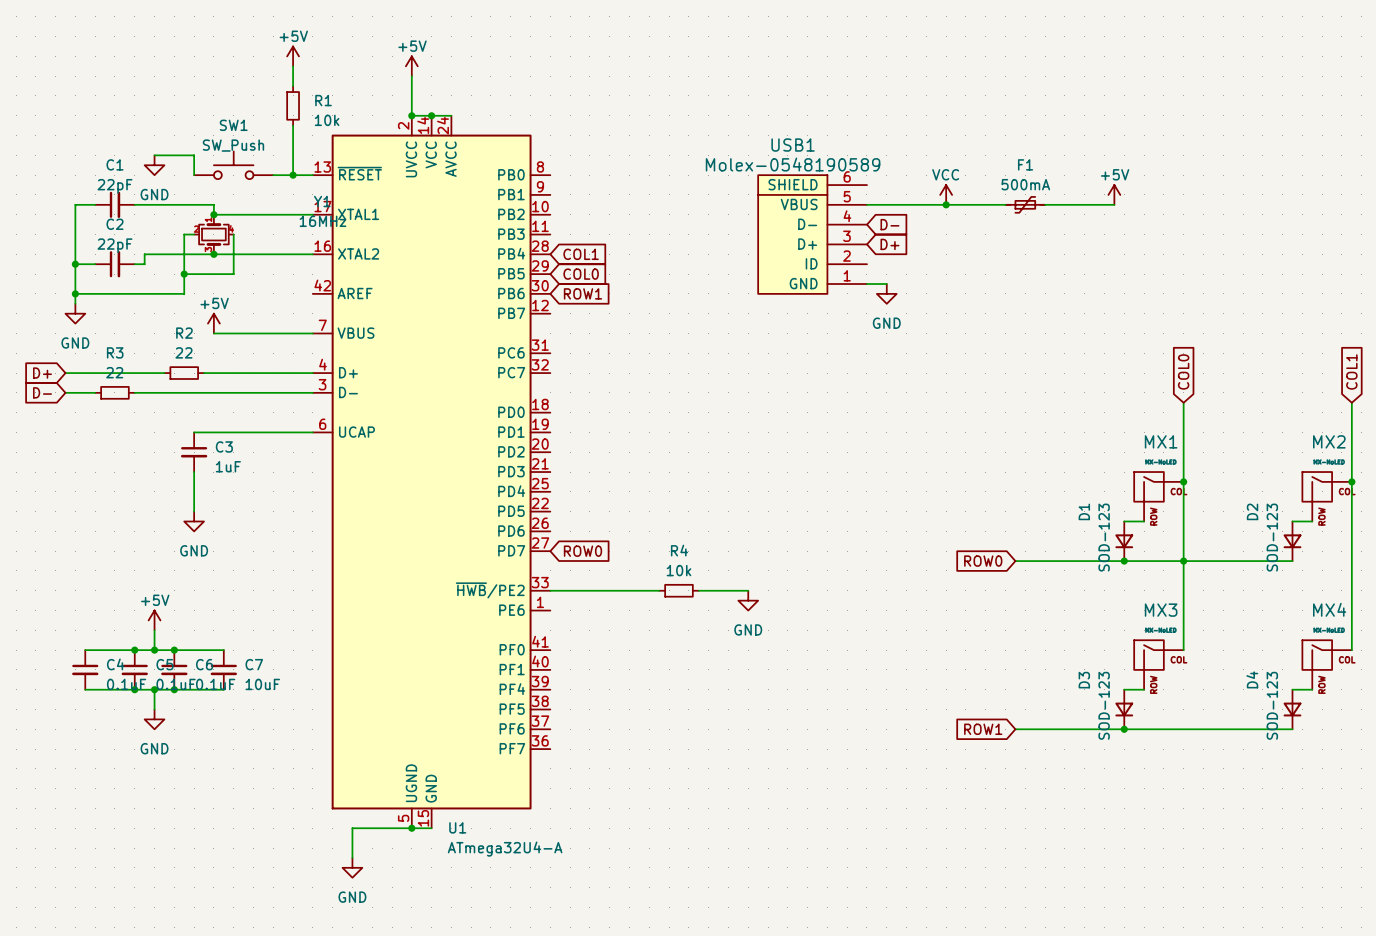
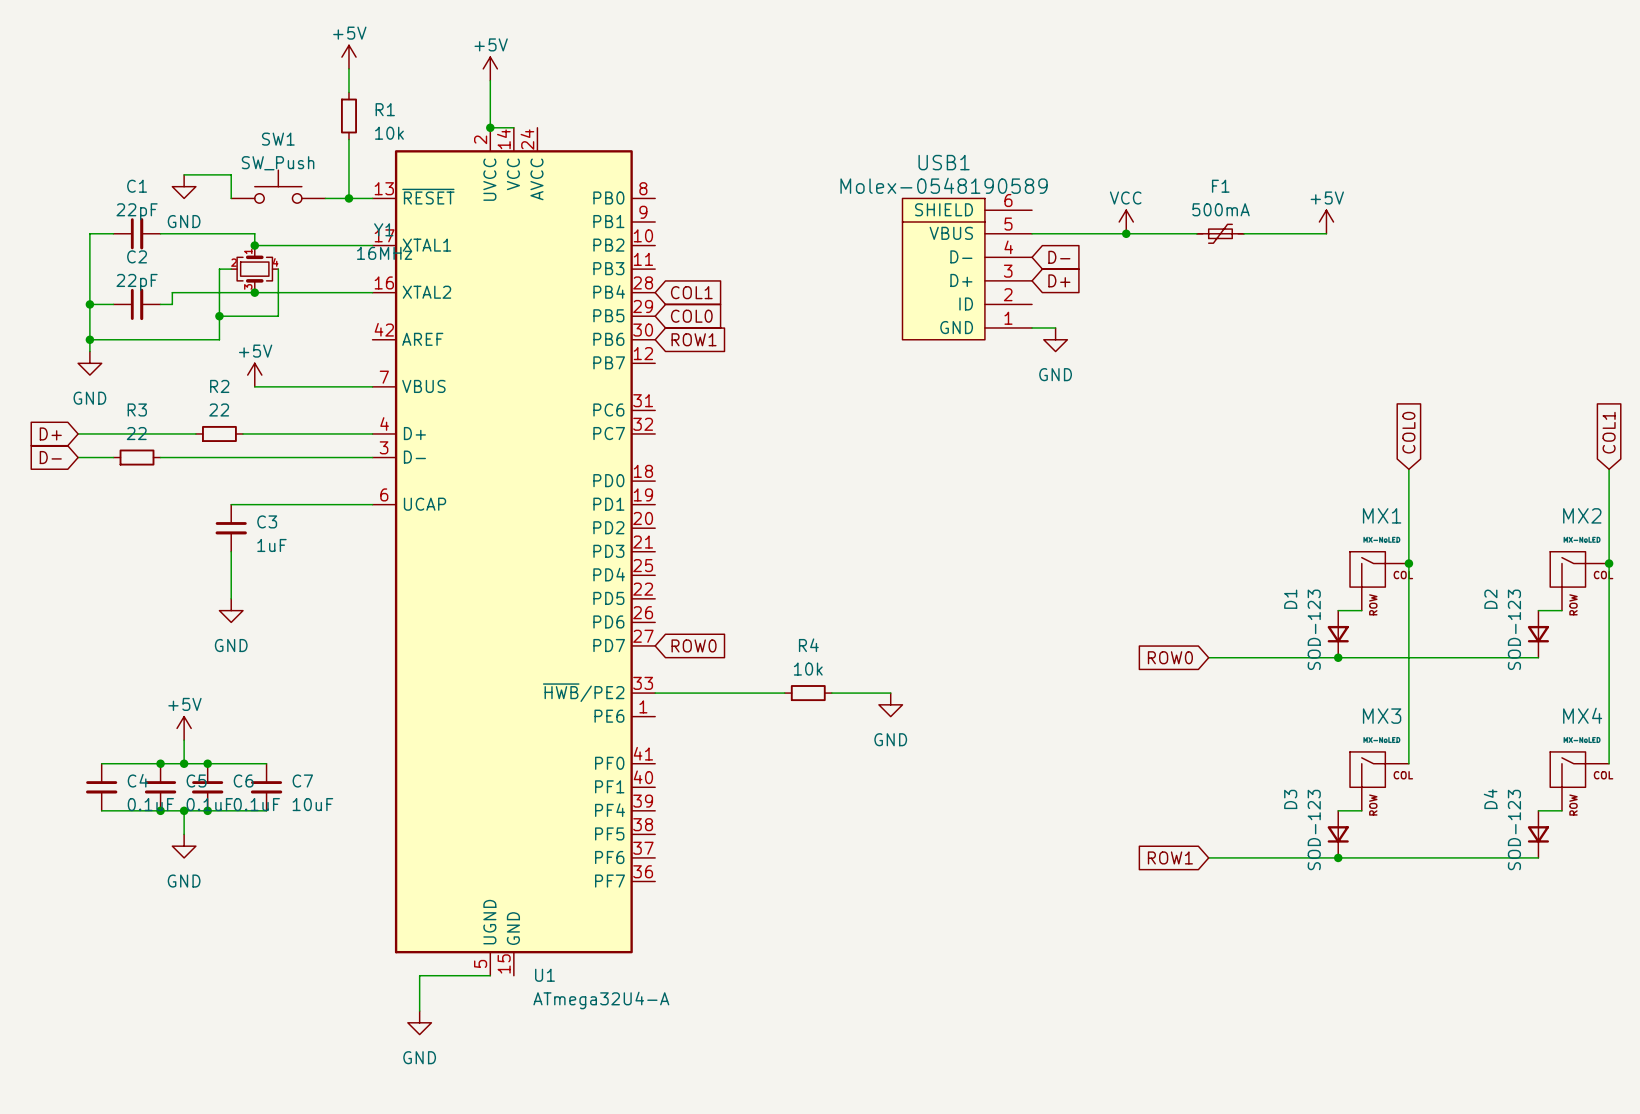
wire: (431, 115) (451, 115) -> none
junction: (431, 115) -> none
junction: (1183, 561) -> none
wire: (411, 828) (431, 828) -> none
junction: (411, 828) -> none

